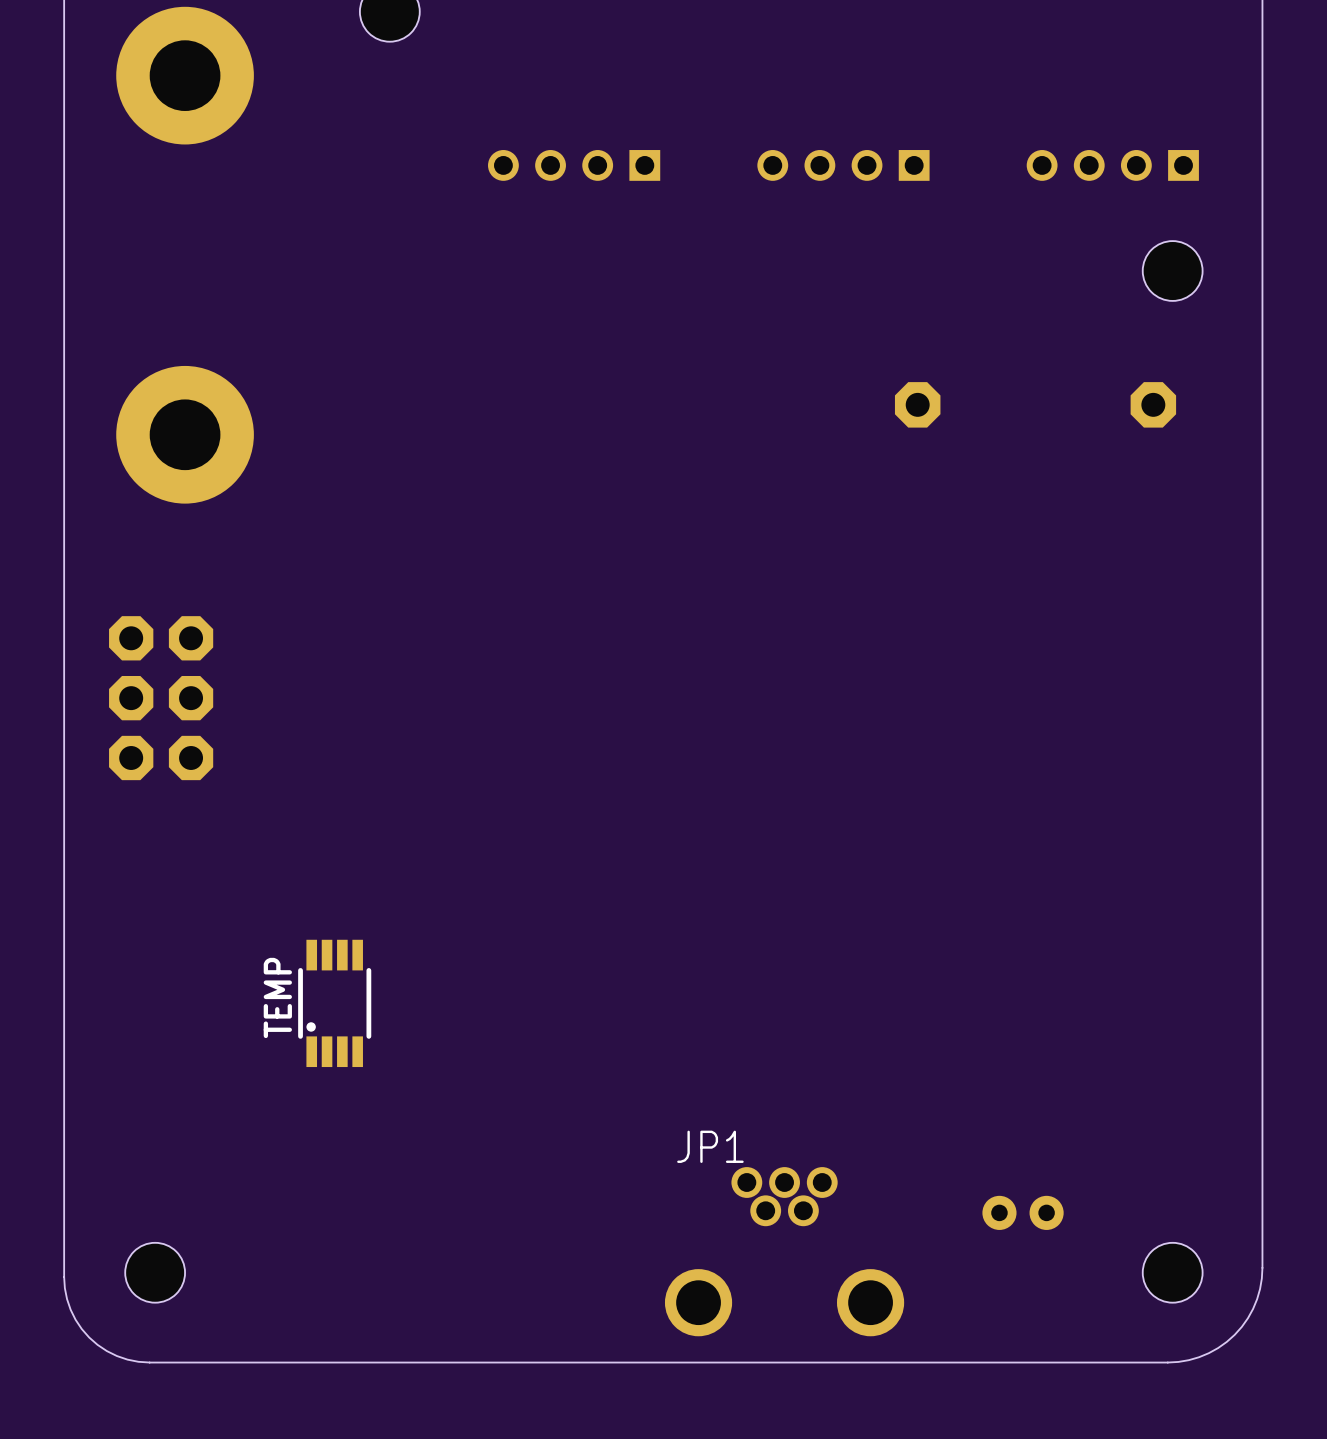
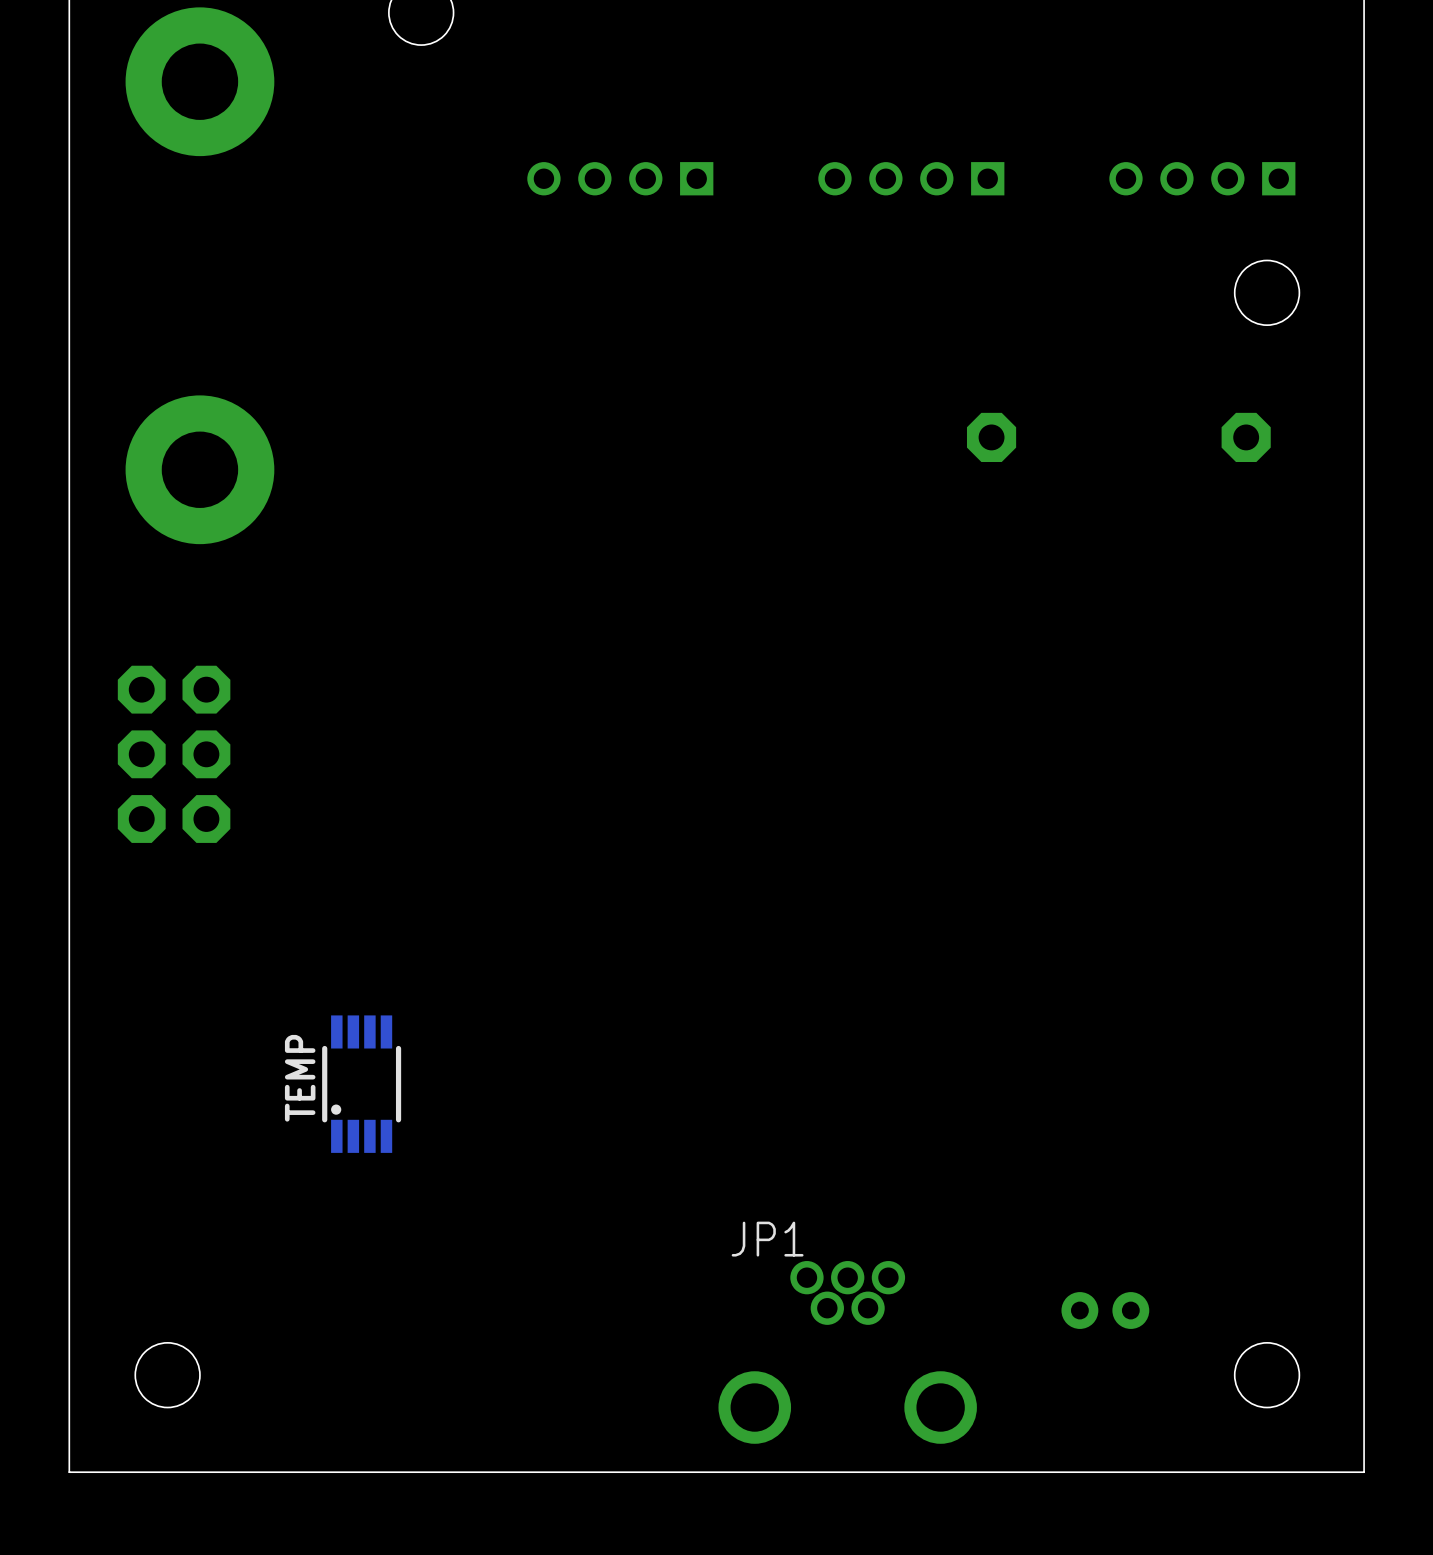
board edge: (1262, 1267) (1260, 1288) (1253, 1308) (1234, 1334) (1208, 1353) (1188, 1360) (1167, 1362) -> (1364, 1369) (1364, 1472) (1261, 1472)
board edge: (64, 1277) (70, 1309) (89, 1337) (116, 1356) (149, 1362) -> (69, 1379) (69, 1472) (161, 1472)

